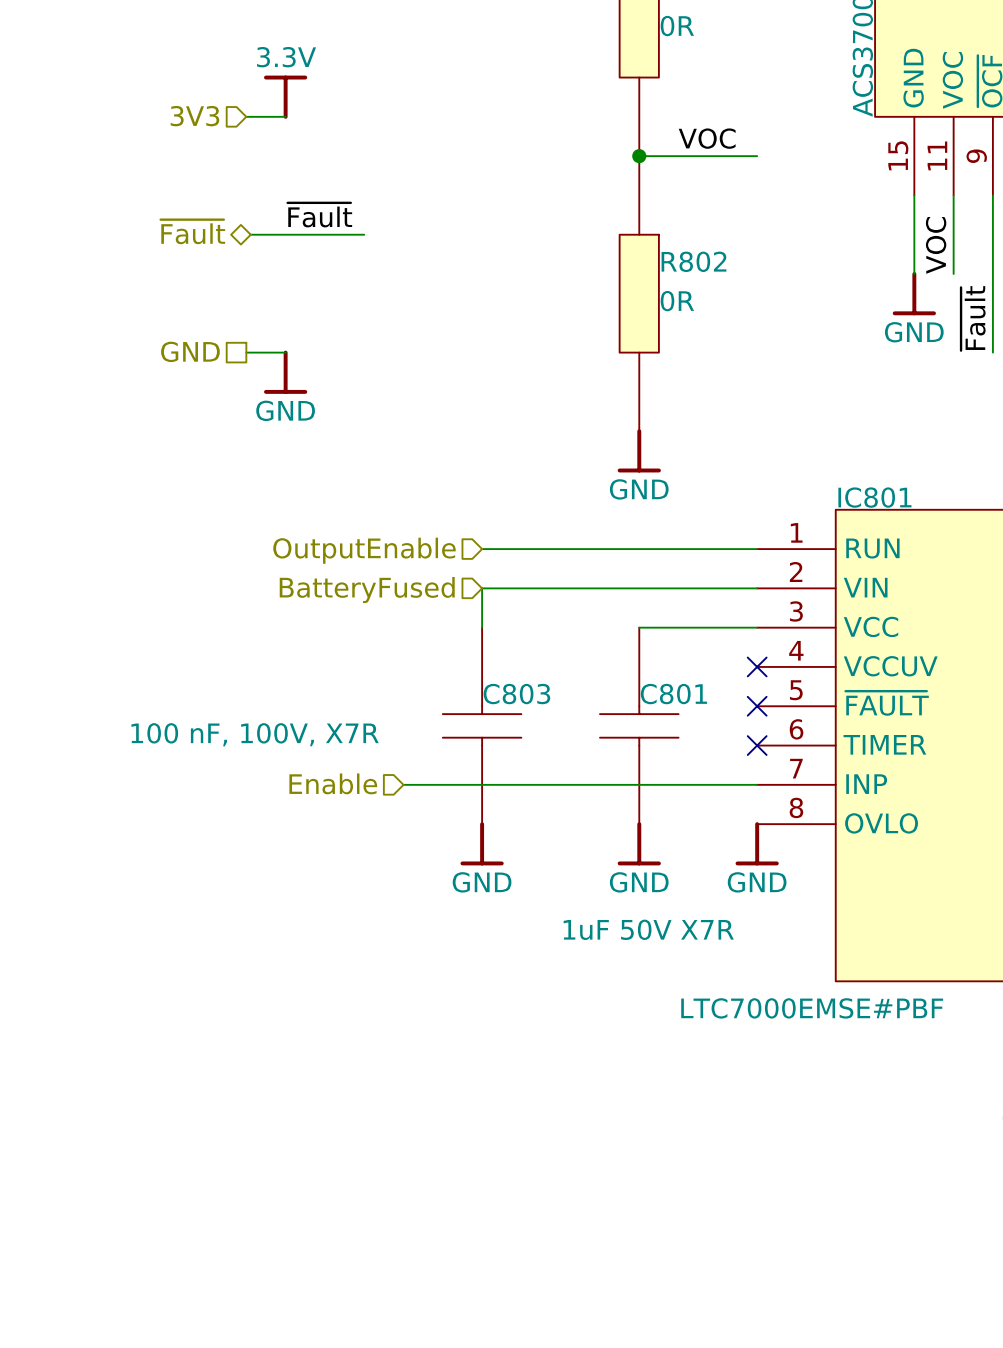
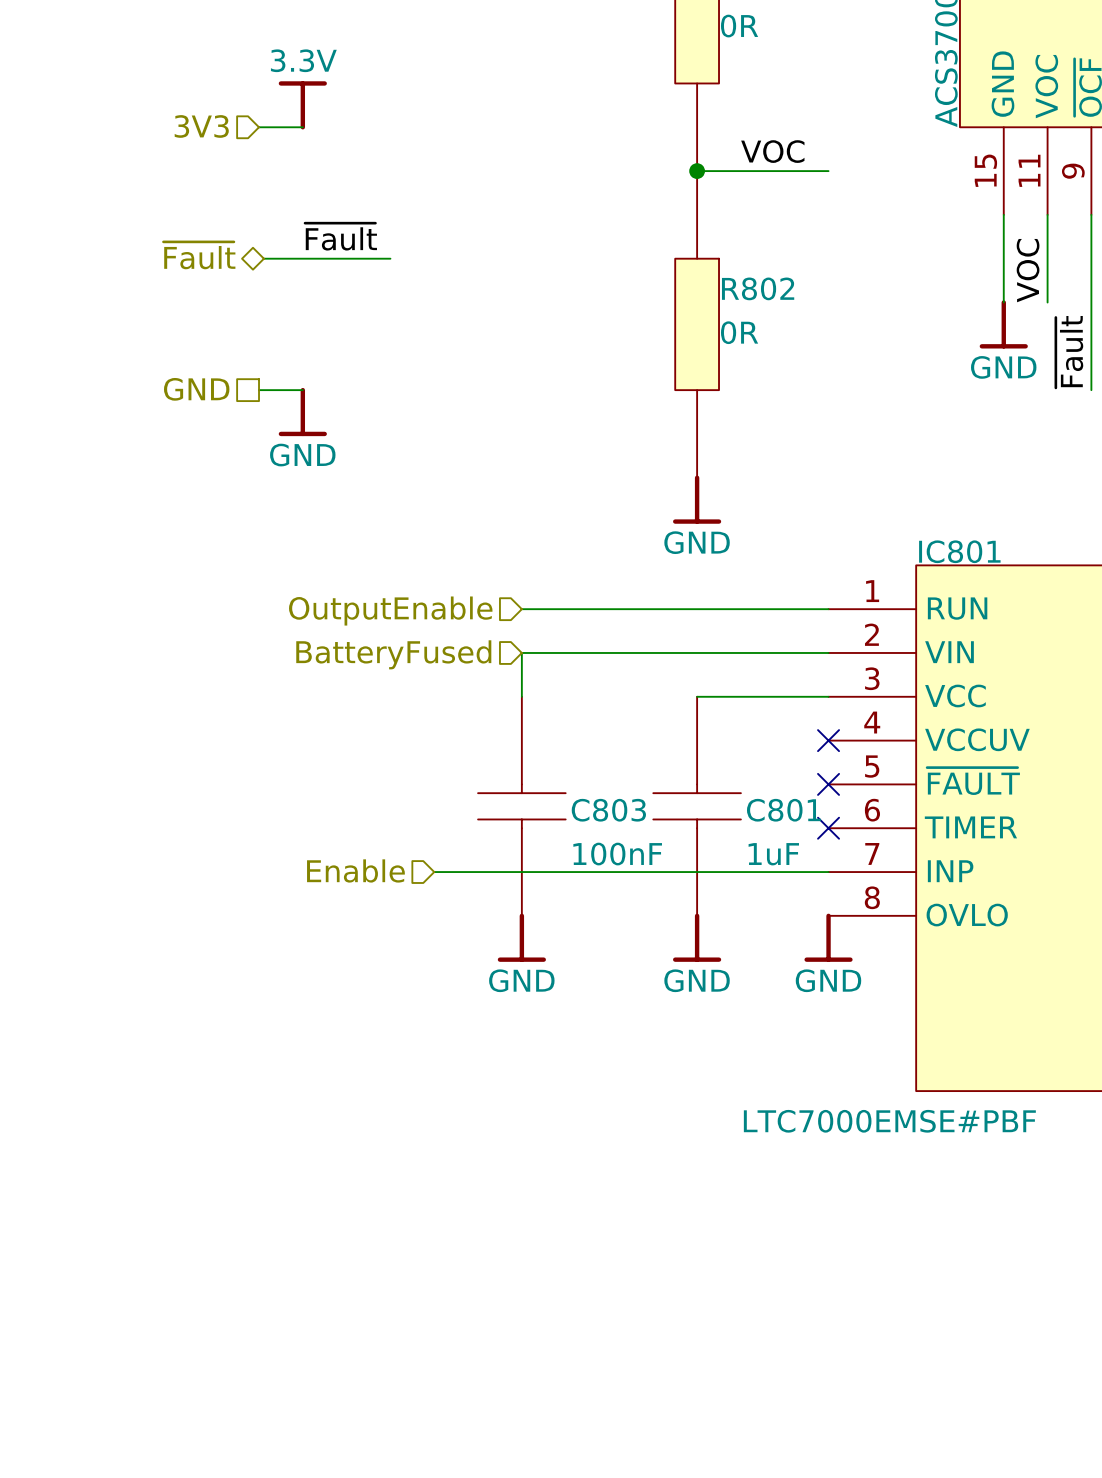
C803 name position: C803 (516, 694) -> C803 (608, 810)
C801 name position: C801 (673, 694) -> C801 (783, 810)
C803 value: 100 nF, 100V, X7R (255, 734) -> none
C803 text: none -> 100nF (617, 854)
C801 text: none -> 1uF (773, 854)
C801 value: 1uF 50V X7R (648, 929) -> none

